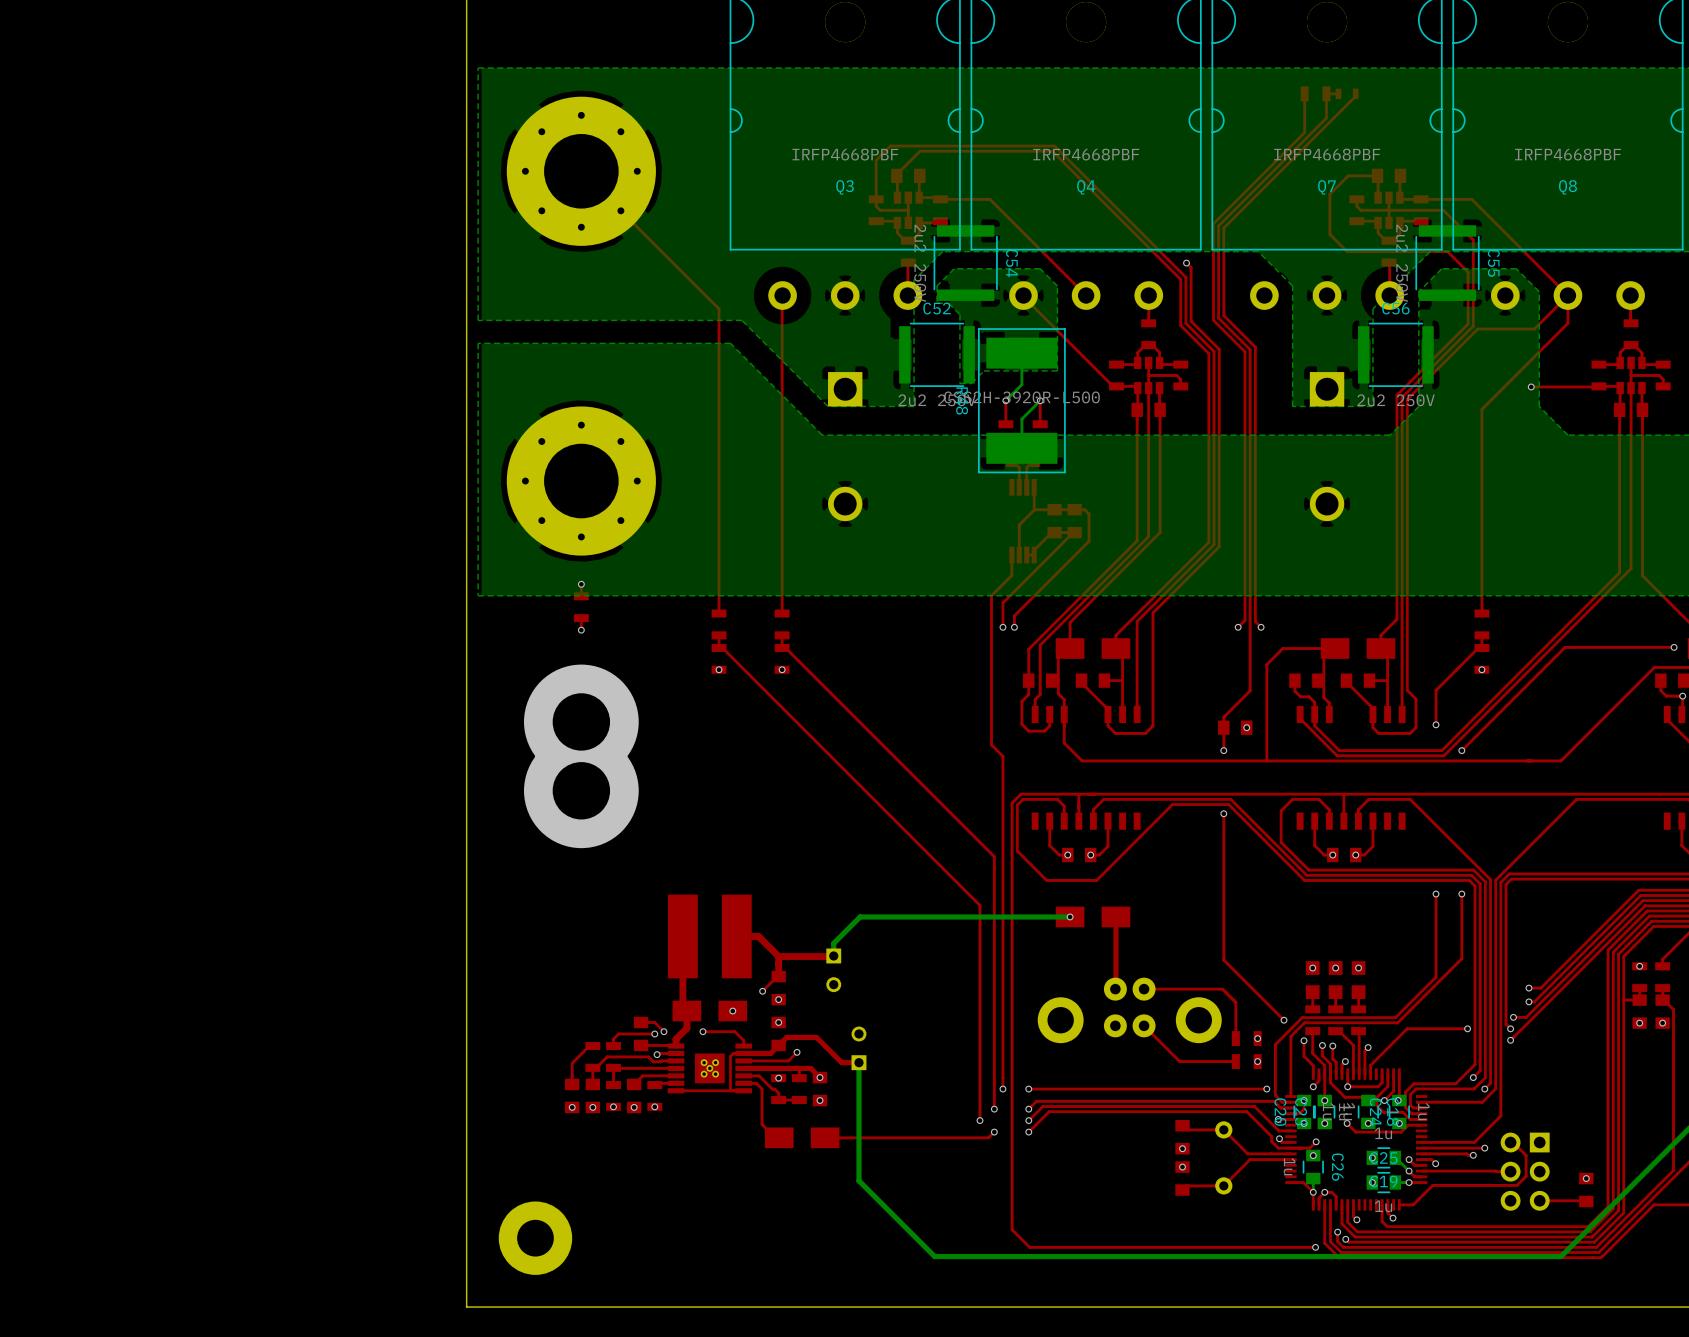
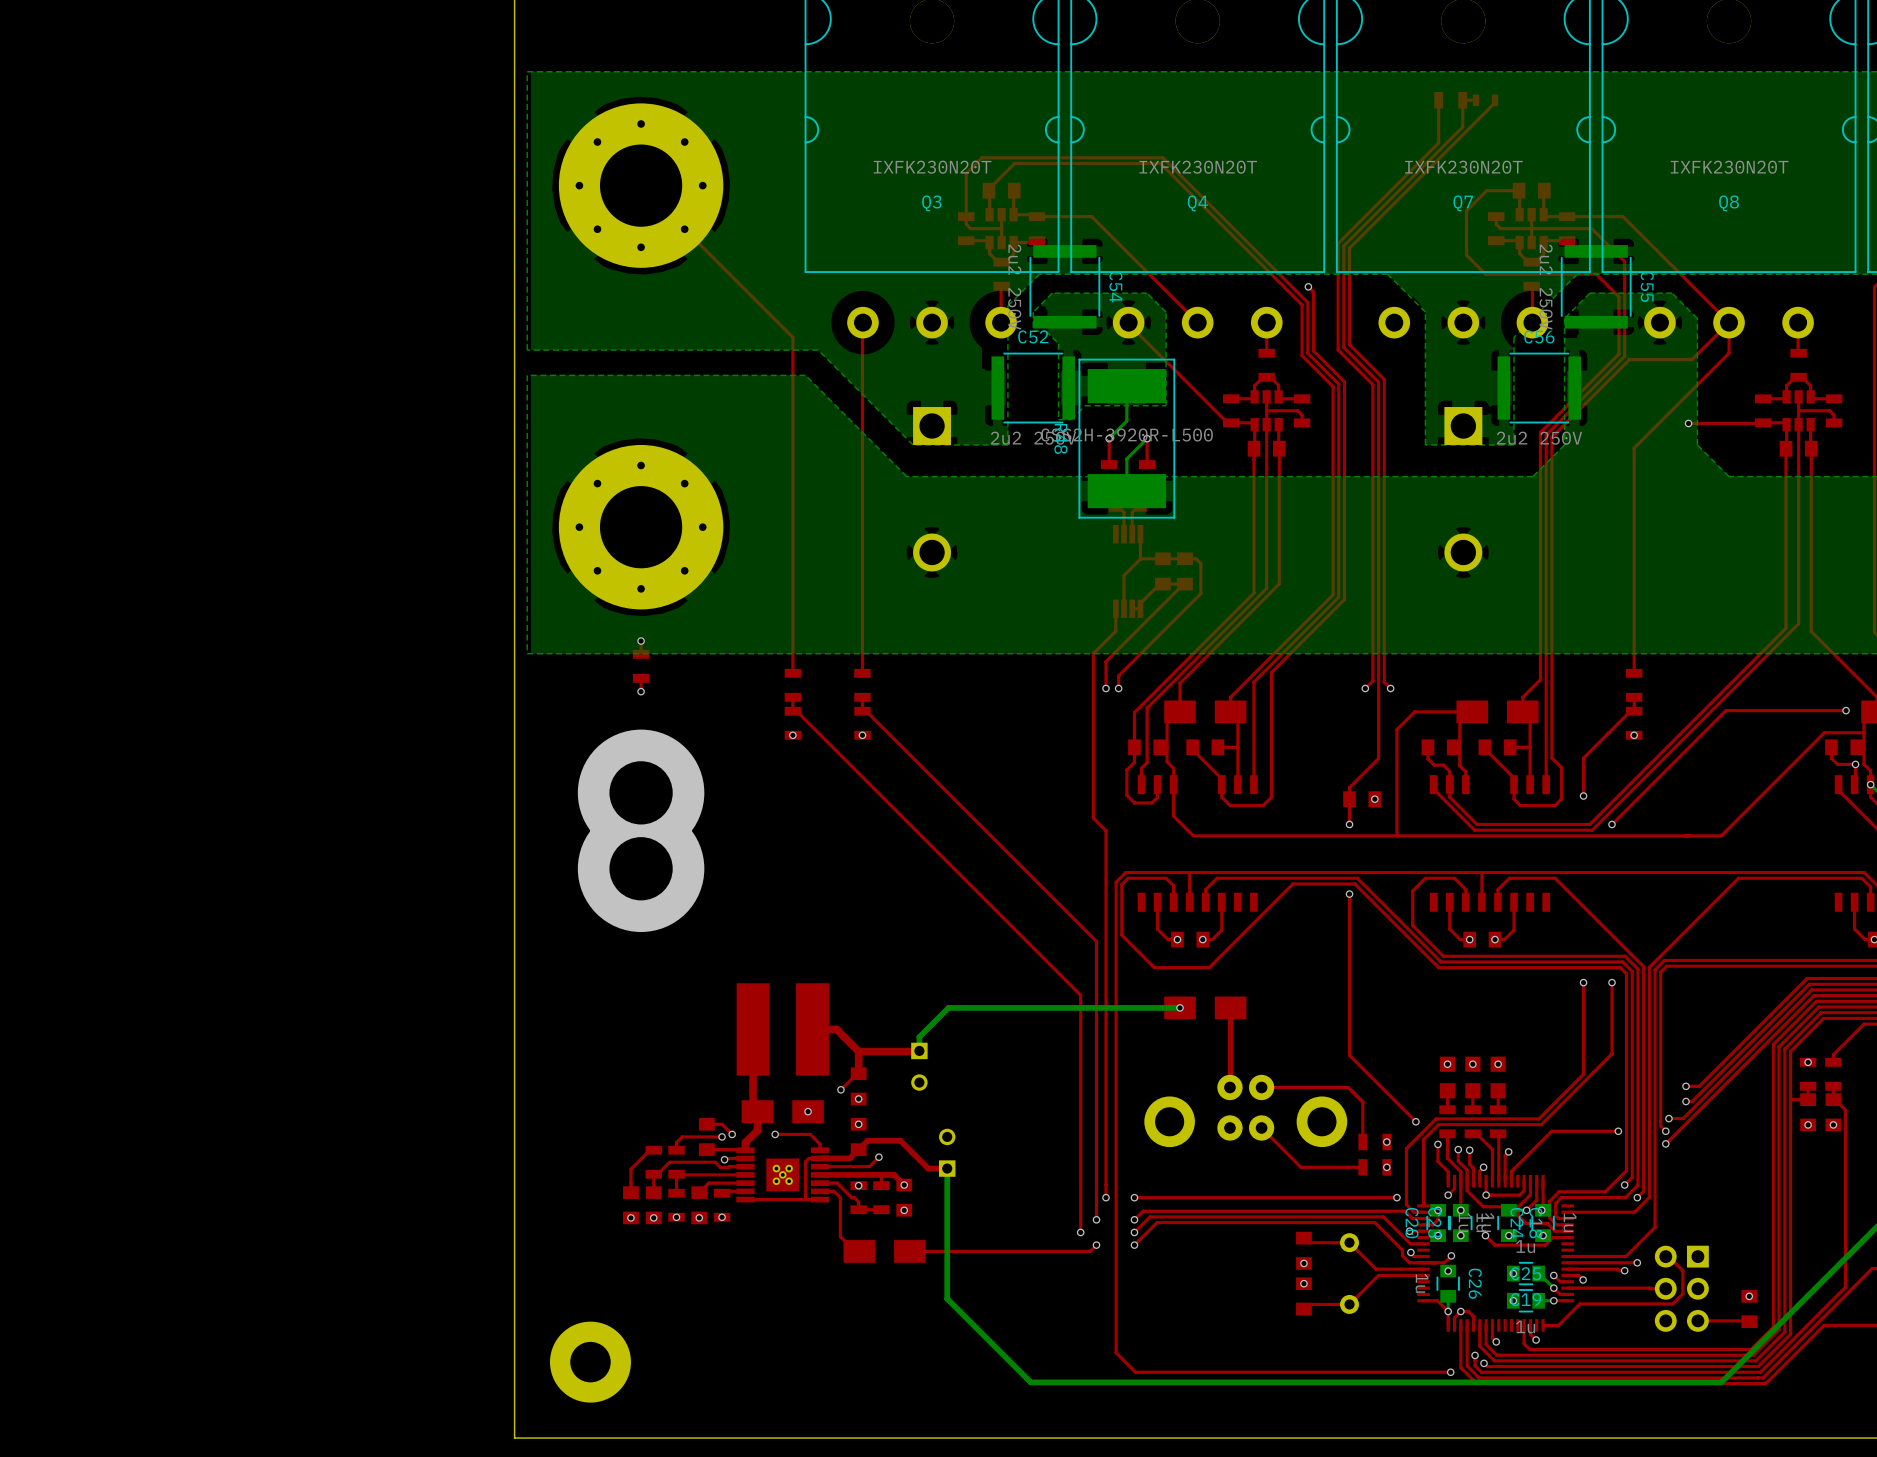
Q3 value: IRFP4668PBF (845, 154) -> IXFK230N20T (932, 167)
Q4 value: IRFP4668PBF (1086, 154) -> IXFK230N20T (1198, 167)
Q7 value: IRFP4668PBF (1327, 154) -> IXFK230N20T (1463, 167)
Q8 value: IRFP4668PBF (1568, 154) -> IXFK230N20T (1729, 167)

